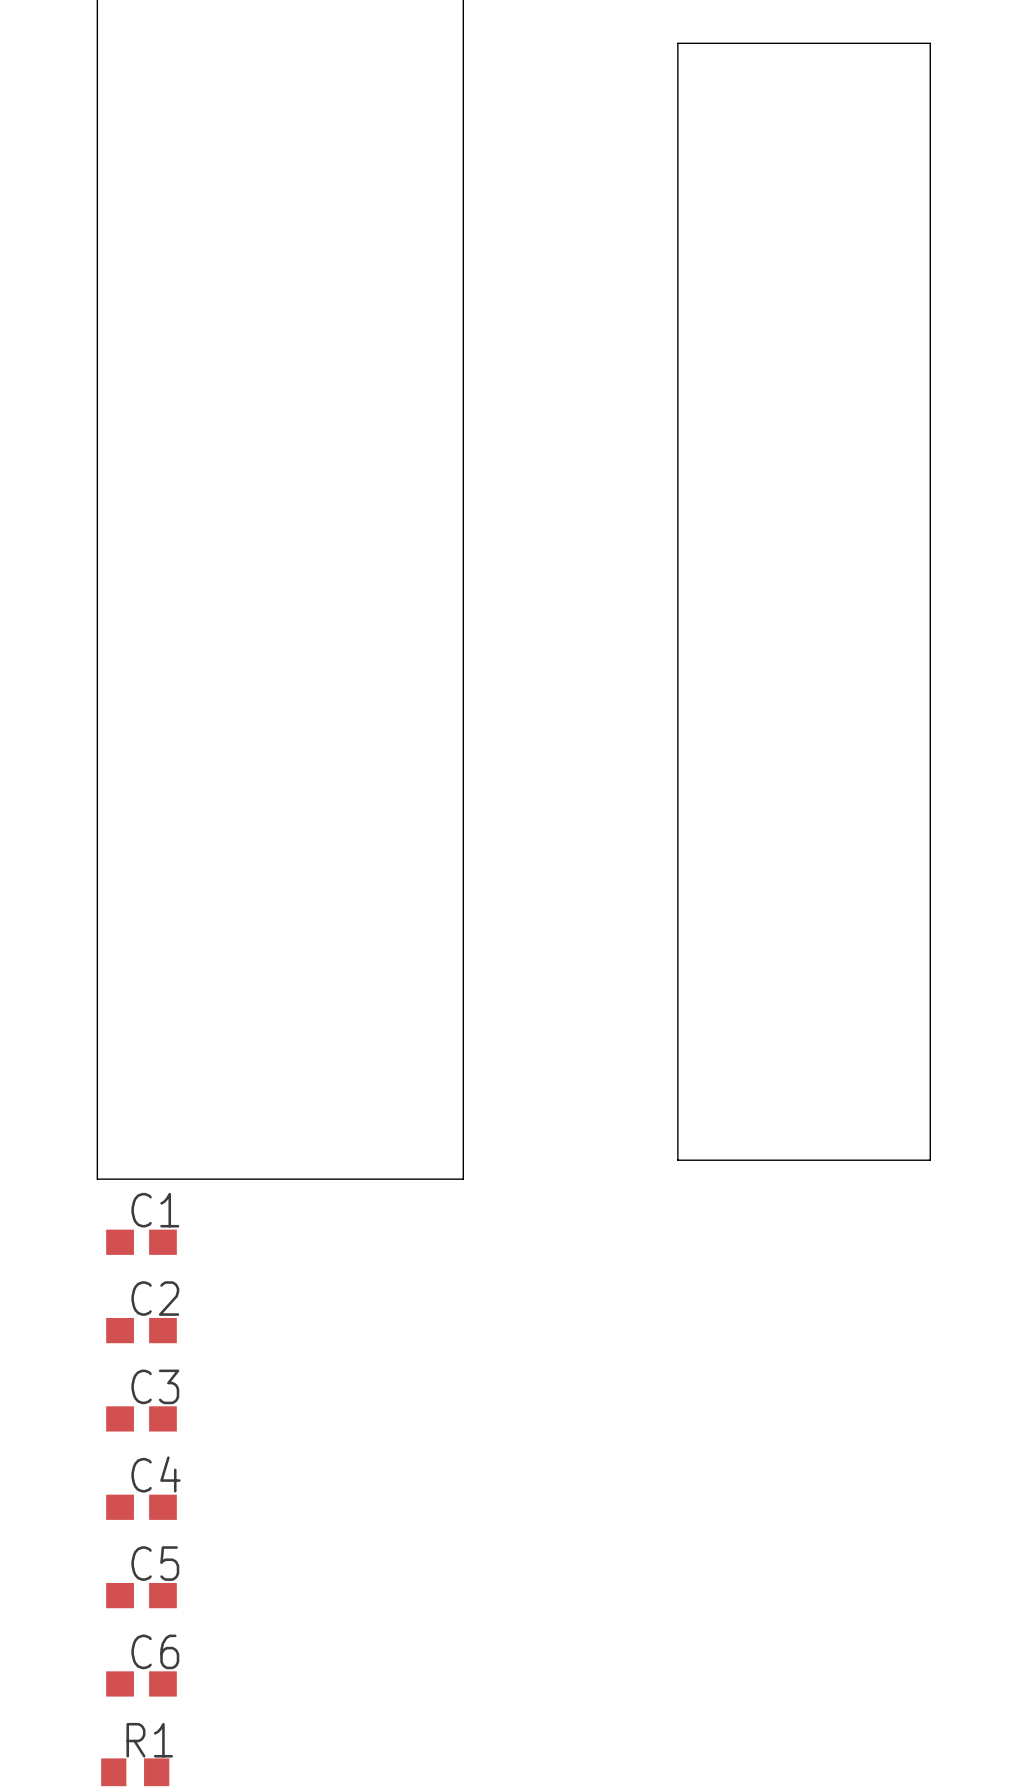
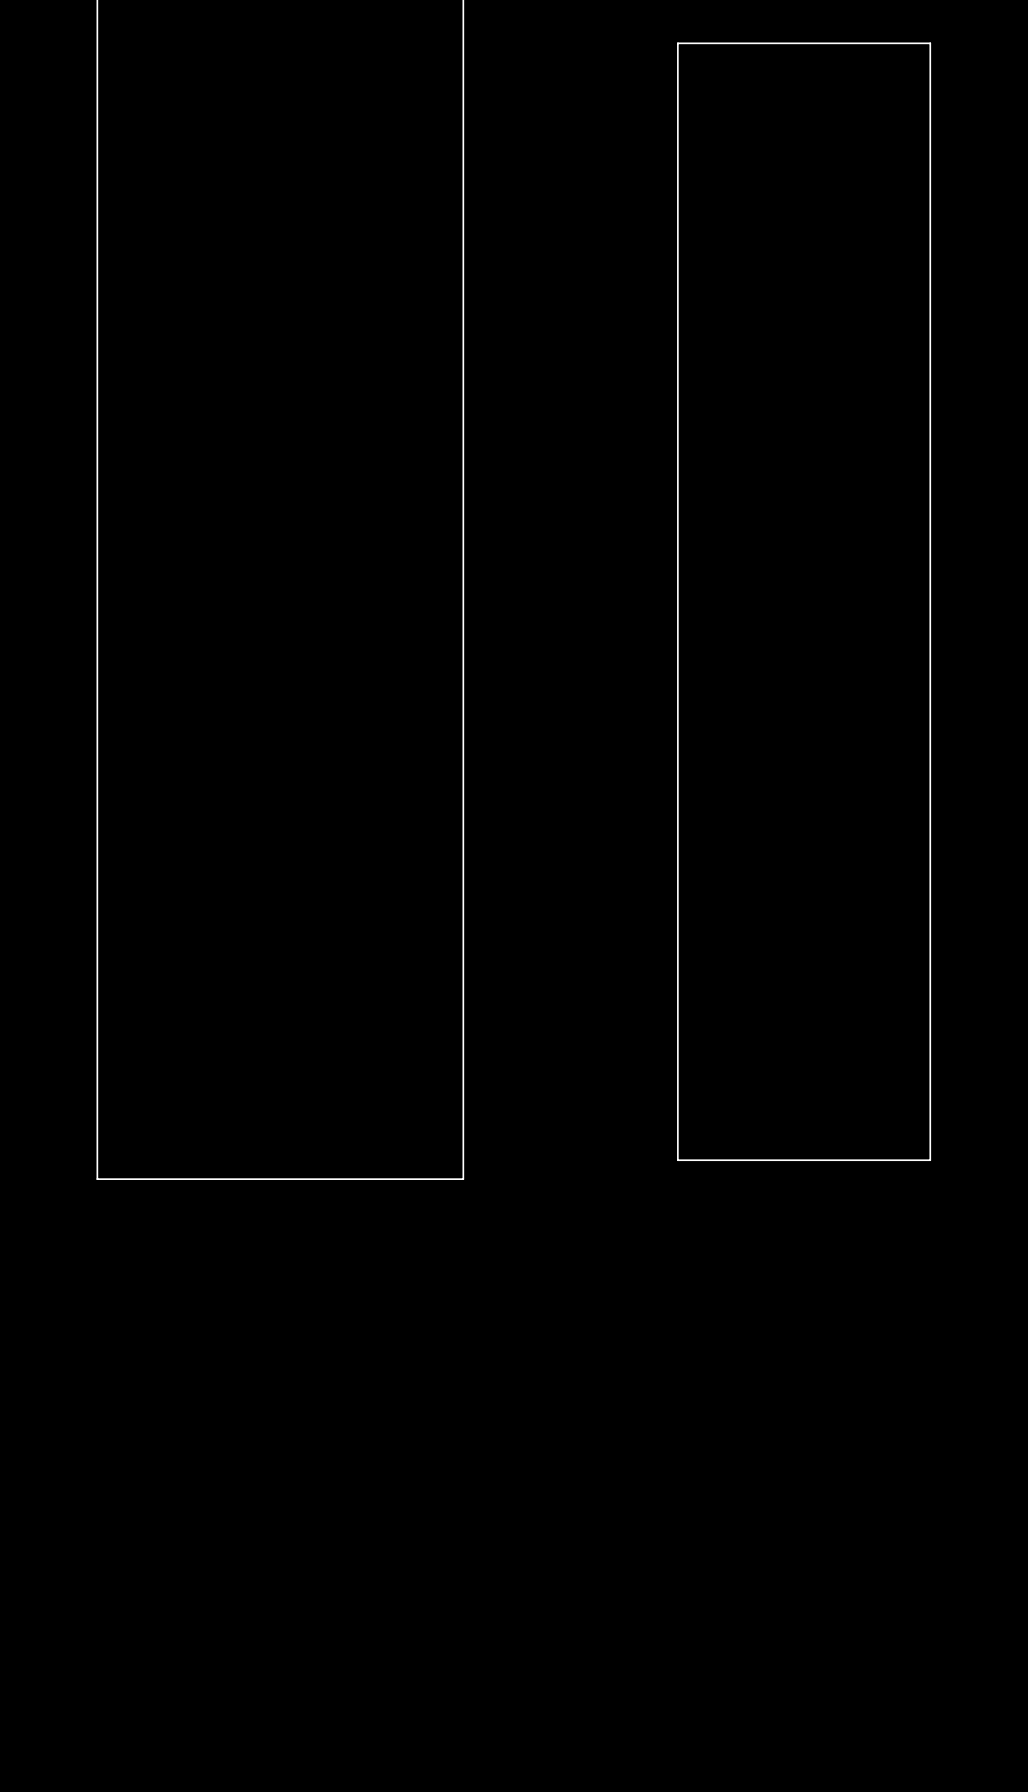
C1: (141, 1242) -> none
C2: (141, 1330) -> none
C3: (141, 1418) -> none
C4: (141, 1507) -> none
C5: (141, 1595) -> none
C6: (141, 1683) -> none
R1: (135, 1772) -> none

